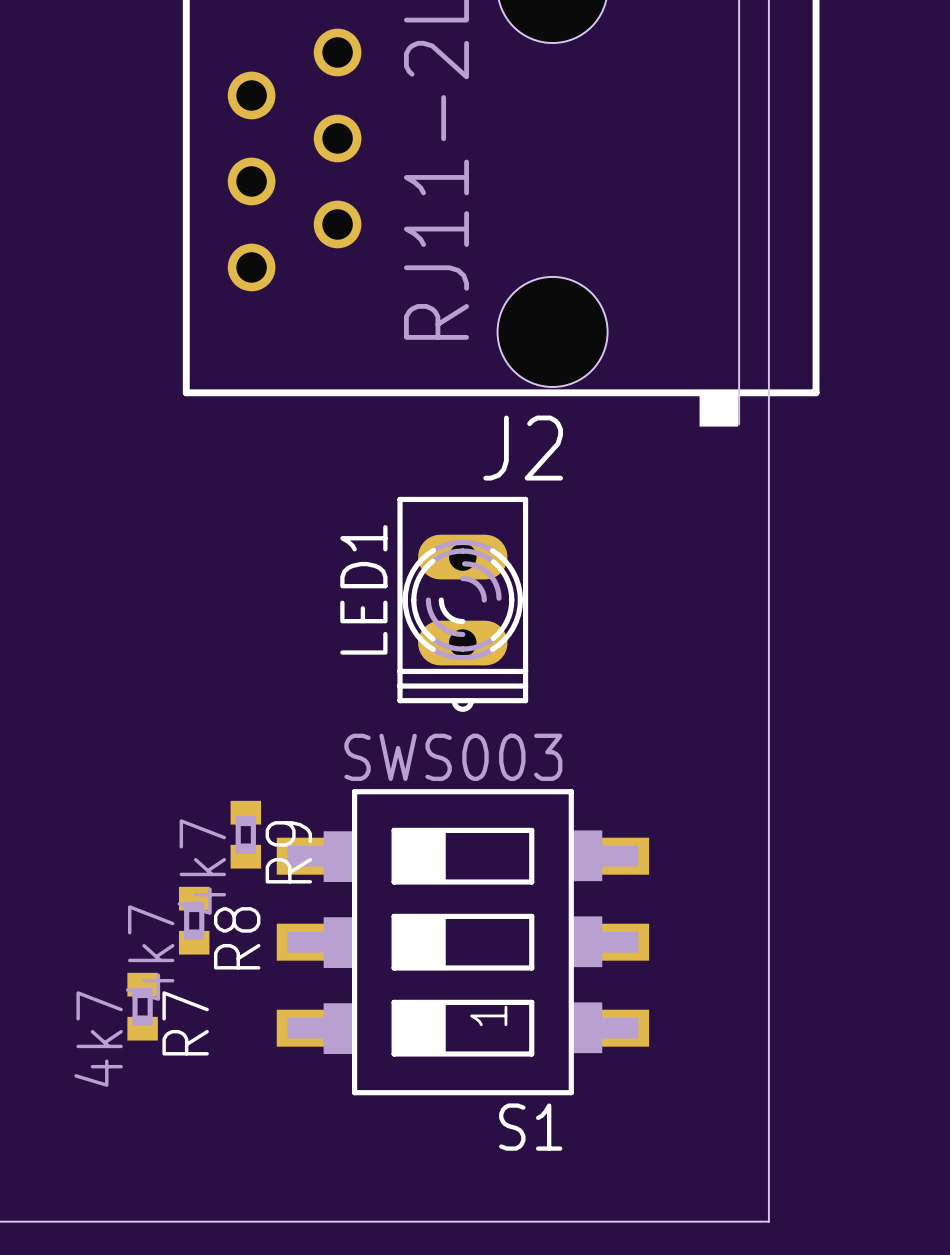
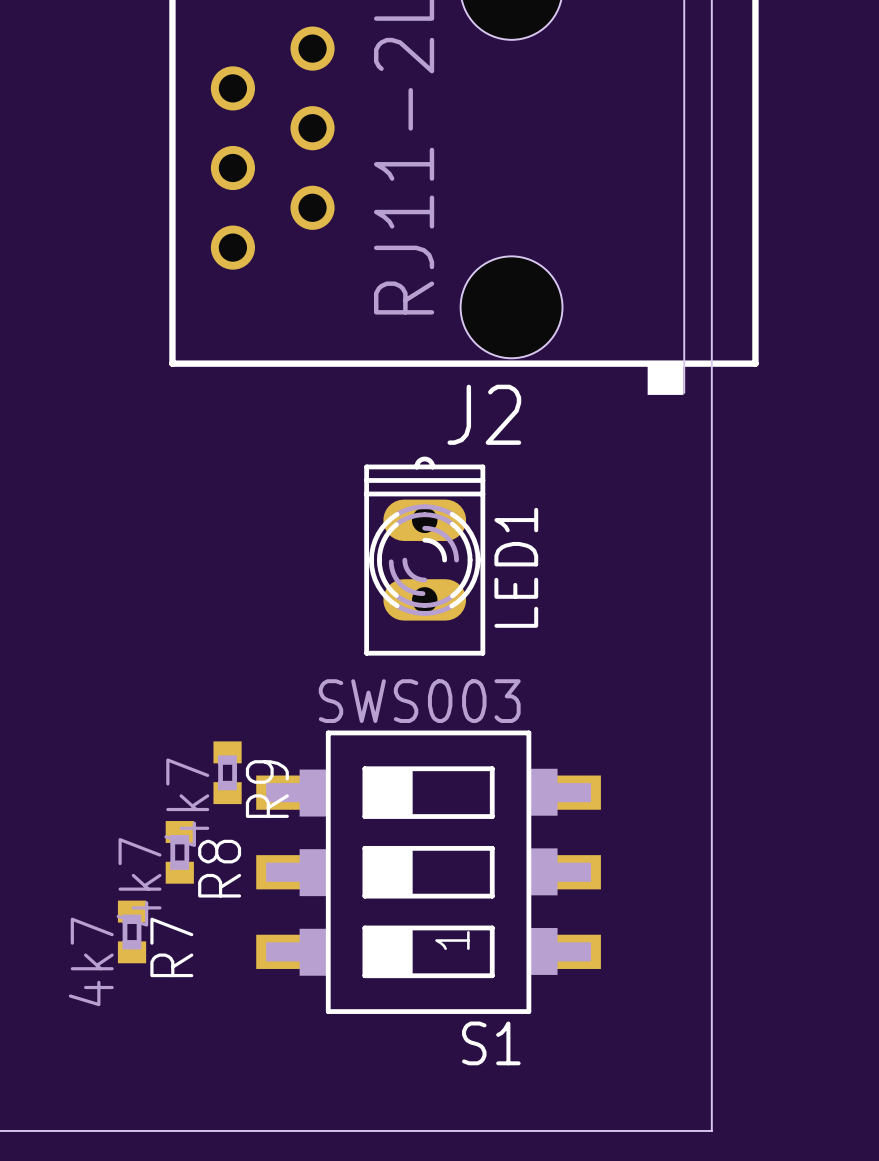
LED1 rotation: 0° (462, 604) -> 180° (424, 556)

